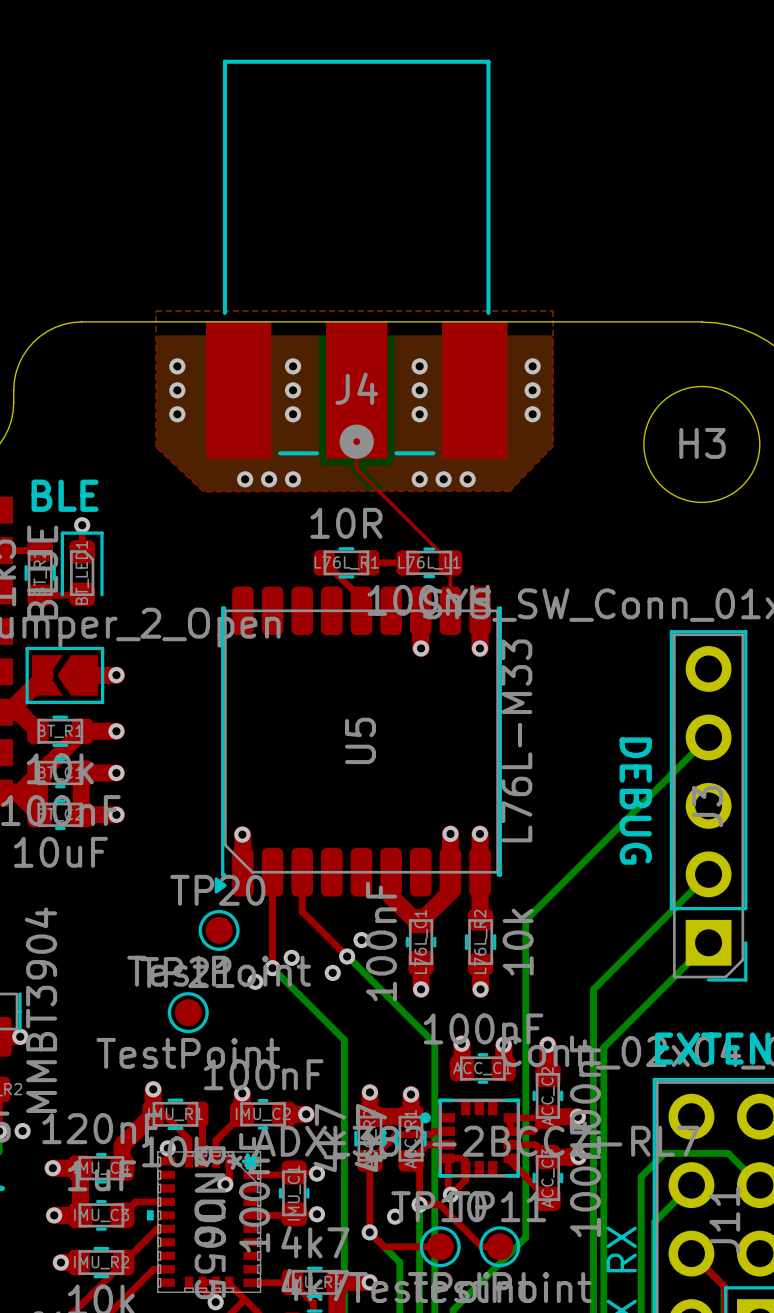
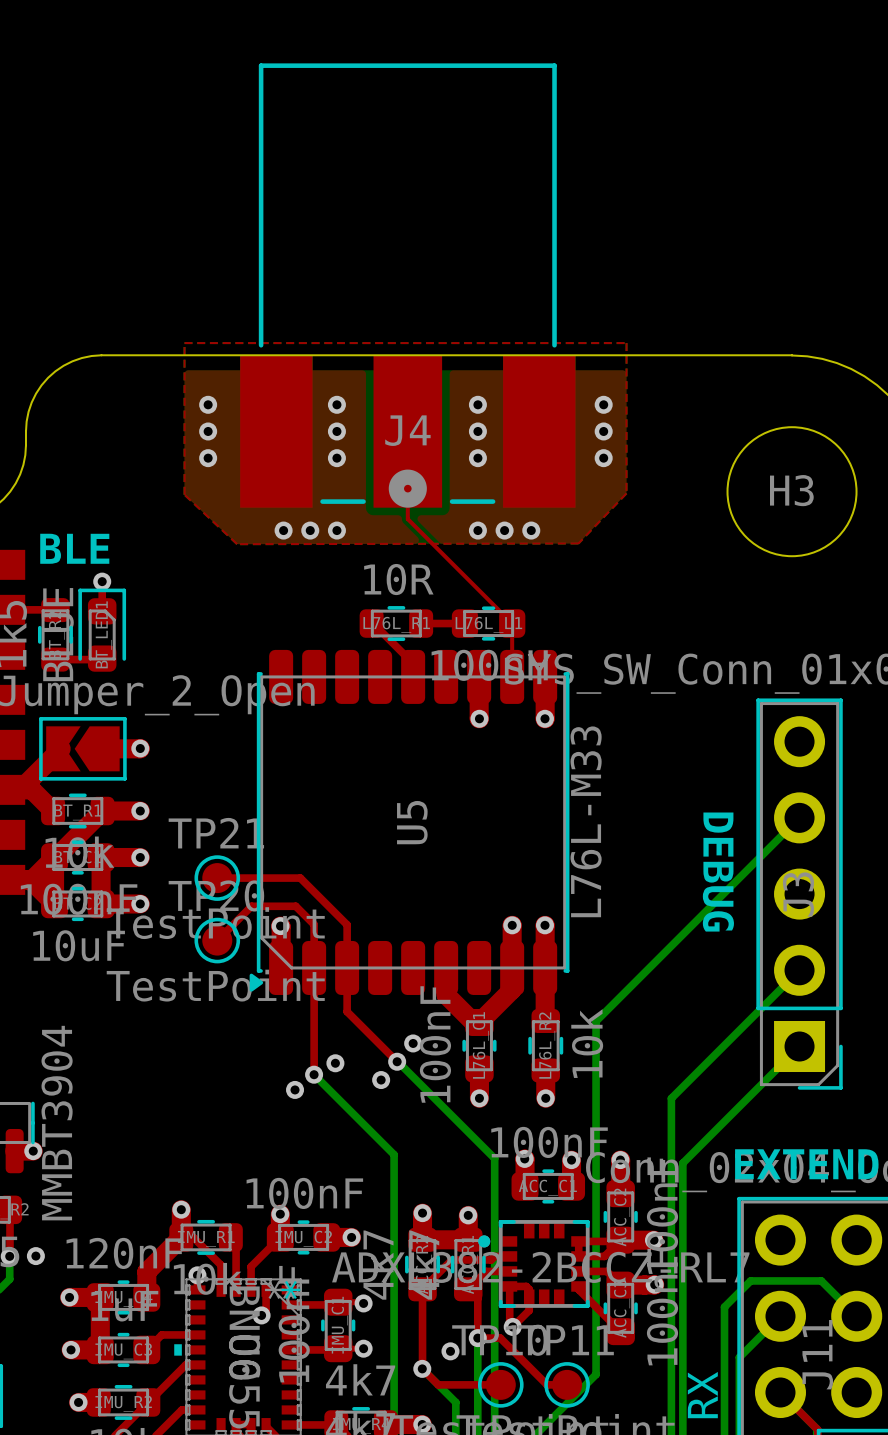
top track: none -> (217, 878) (300, 878) (347, 924) (347, 967)
top track: none -> (217, 940) (251, 906) (295, 906) (314, 924) (314, 967)
TP20 position: (219, 930) -> (217, 940)
TP21 position: (188, 1012) -> (217, 878)

